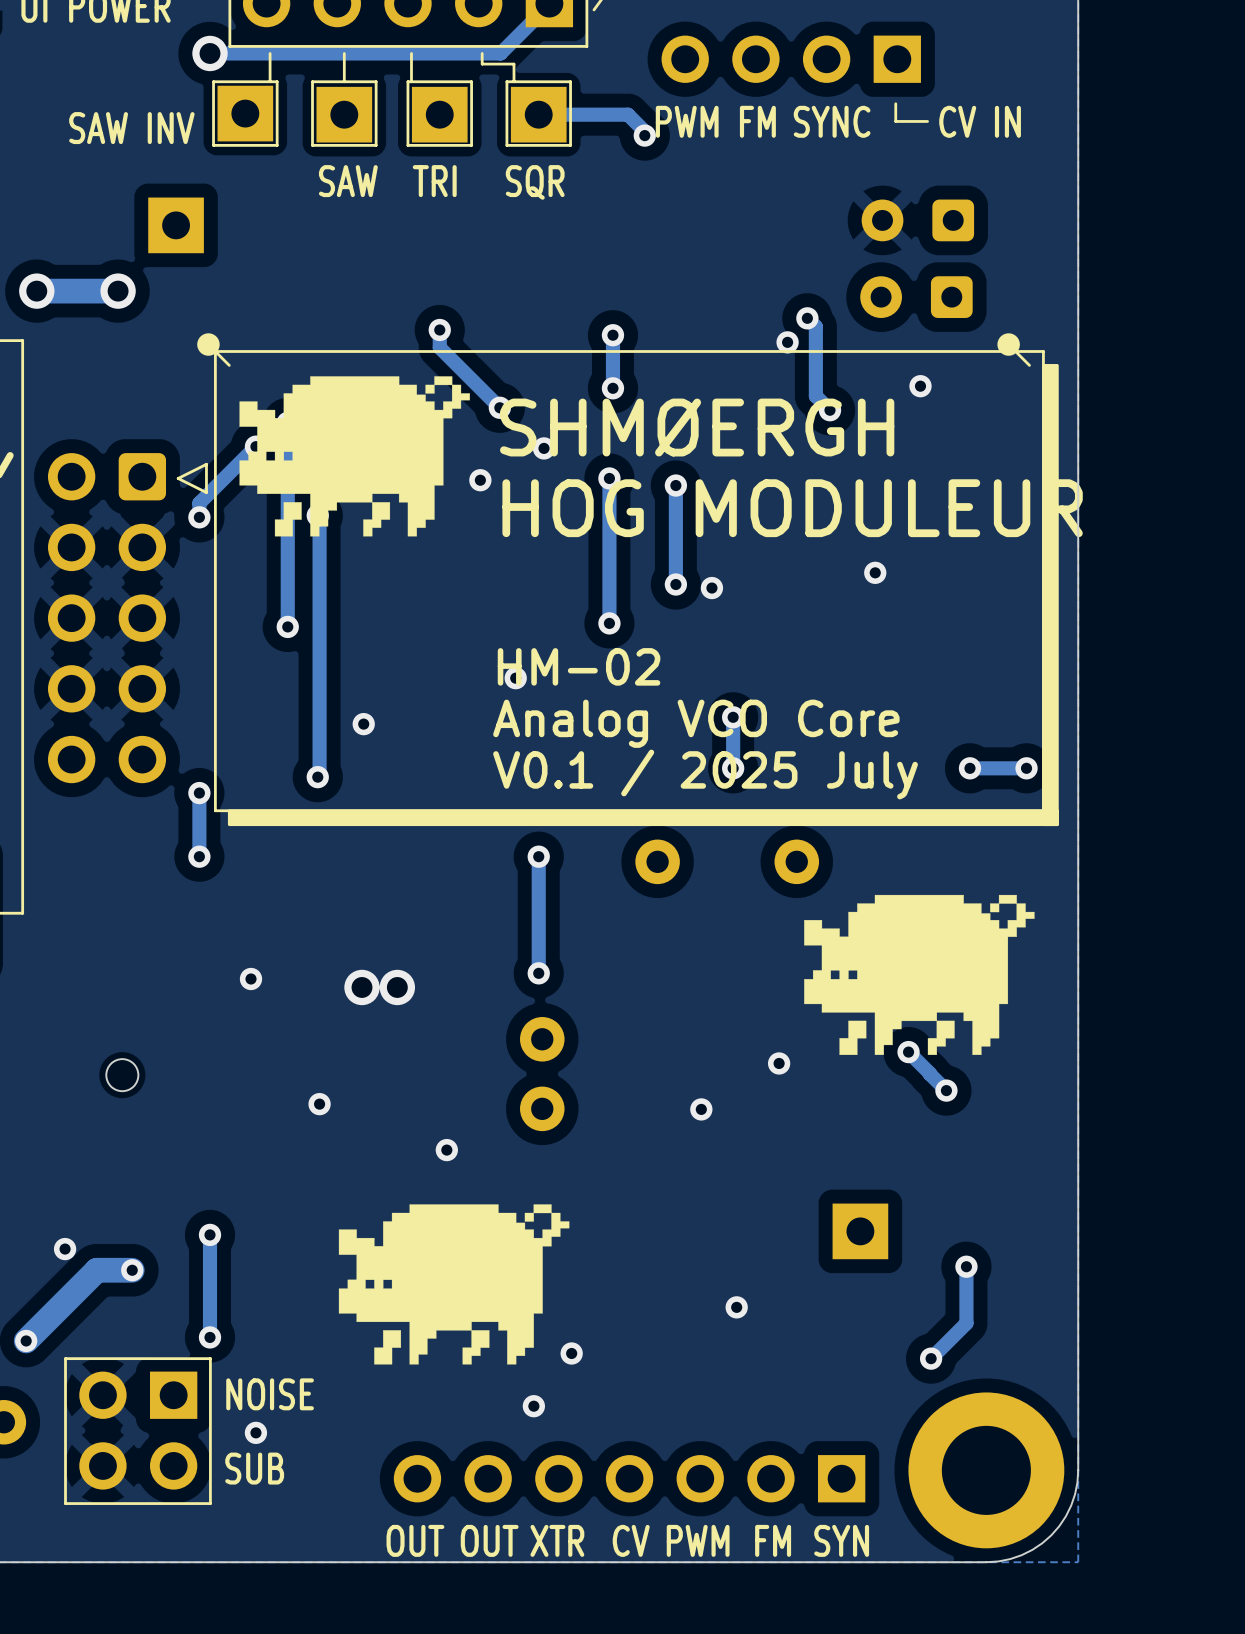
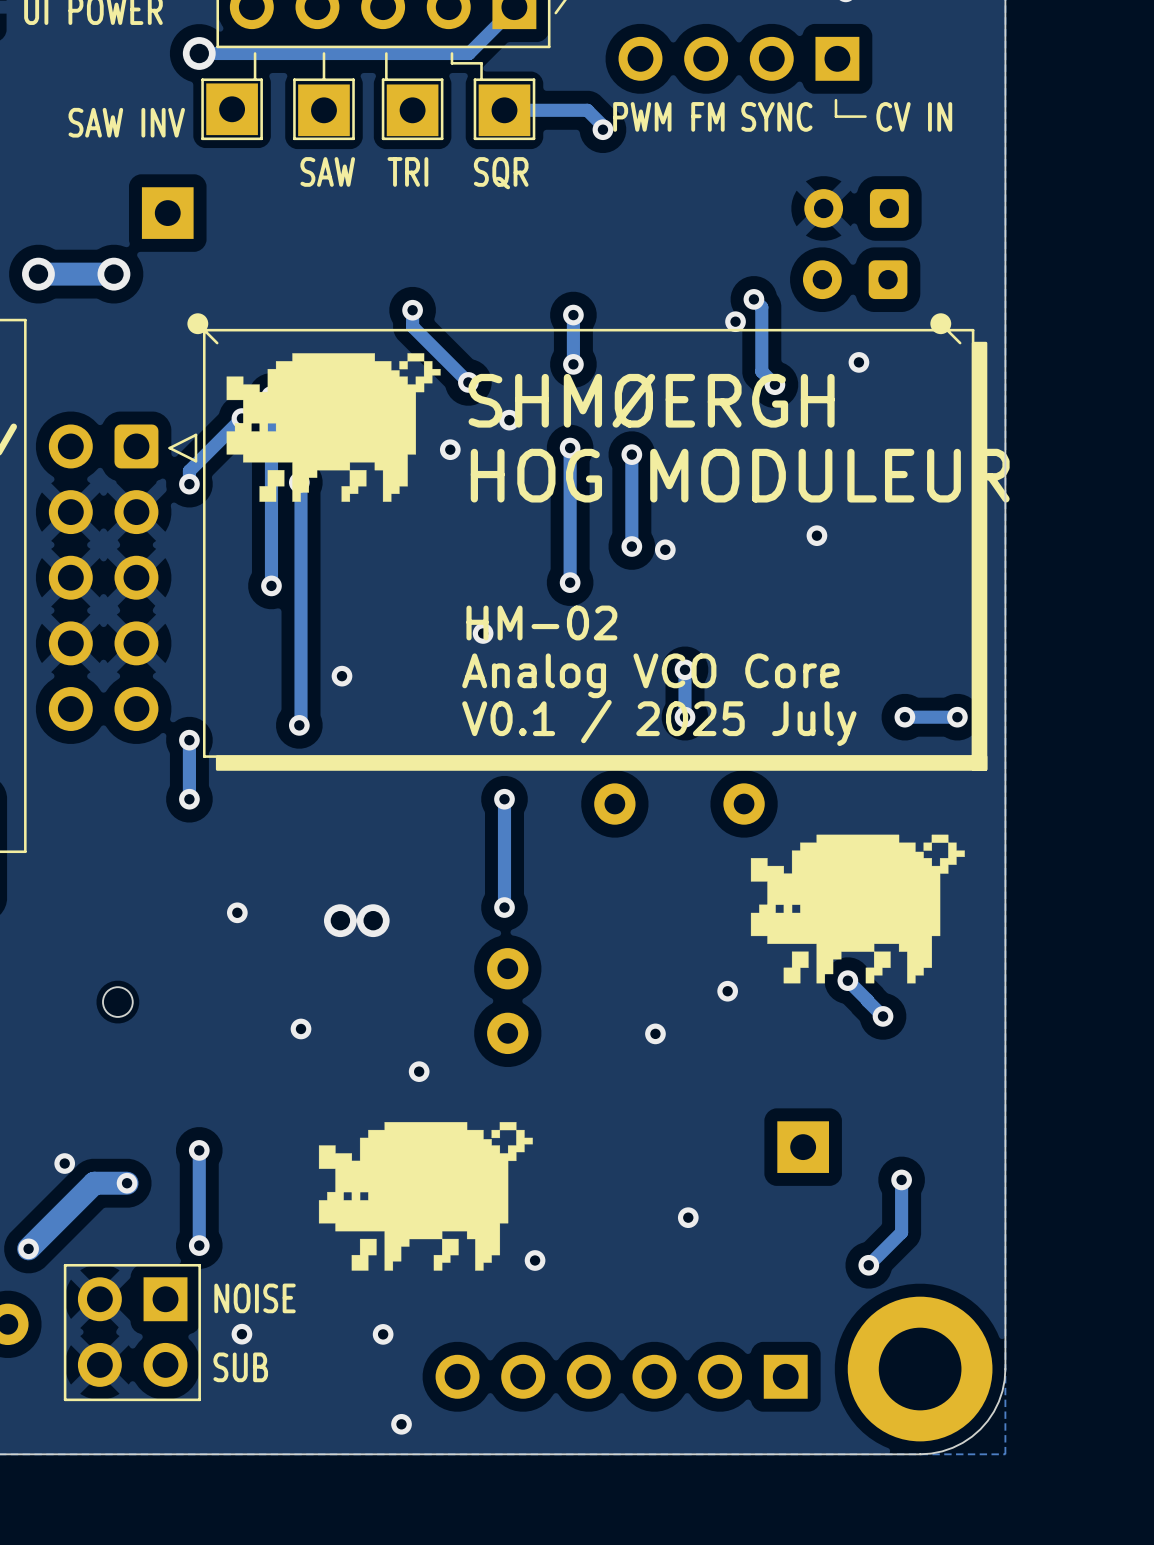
via: (533, 1406) -> none
via: none -> (383, 1334)
part: (629, 1478) -> none
via: none -> (401, 1424)
text: OUT (415, 1540) -> none
text: OUT (489, 1540) -> none
text: XTR (557, 1540) -> none
text: CV (631, 1540) -> none
text: PWM (698, 1540) -> none
text: FM (773, 1540) -> none
text: SYN (841, 1540) -> none

